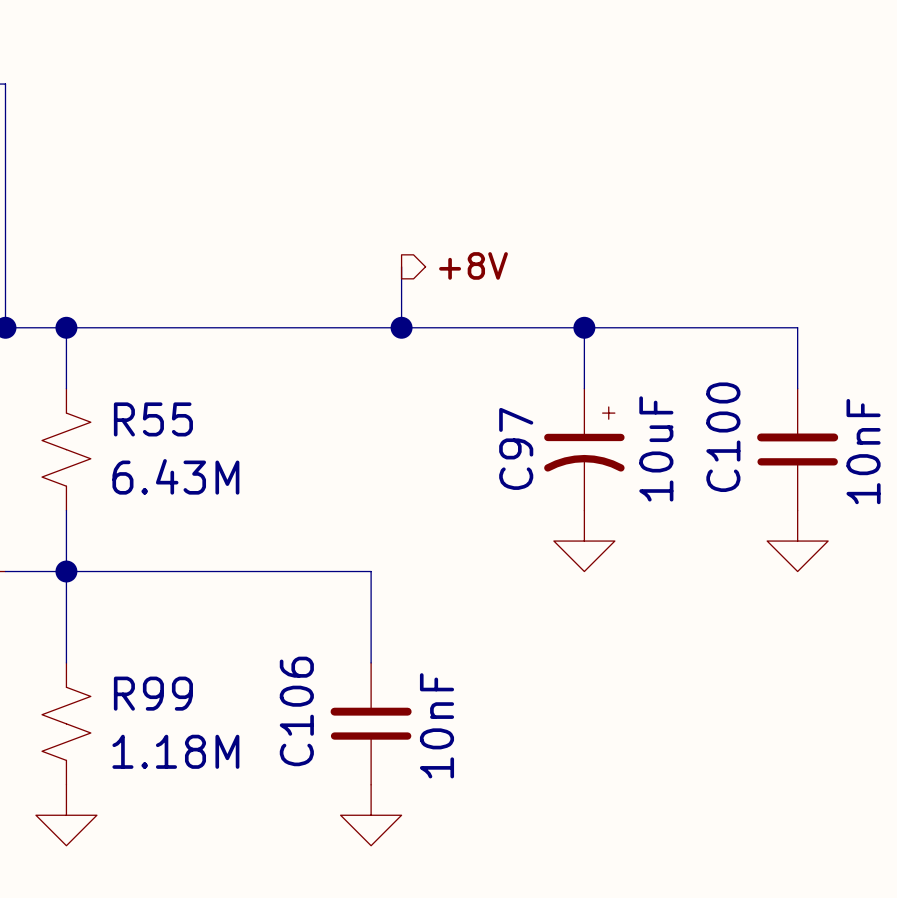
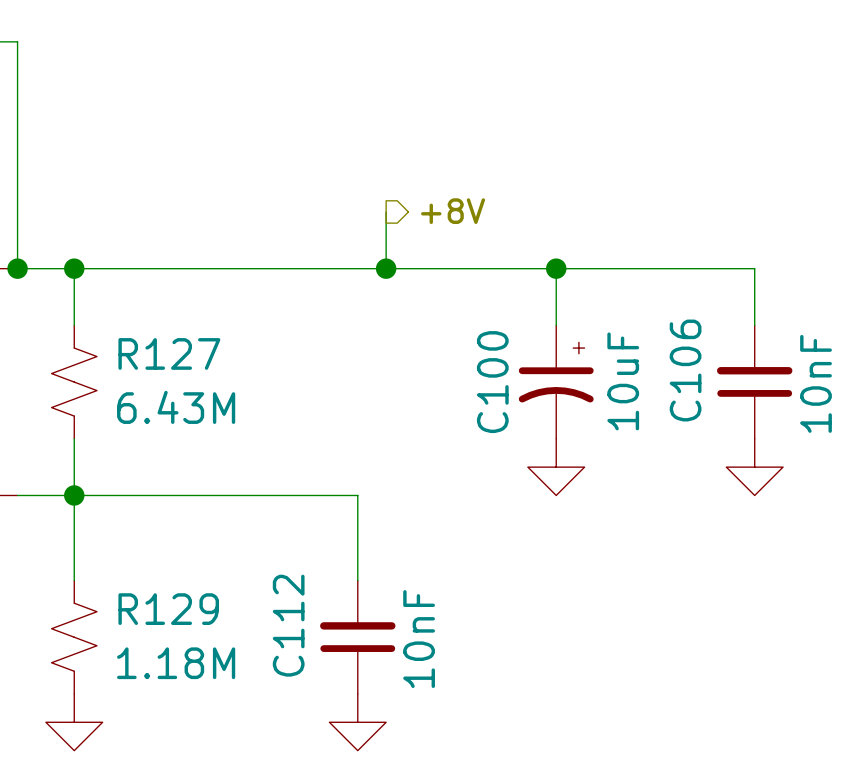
R55 name: R55 (153, 419) -> R127 (169, 353)
C100 name: C100 (723, 437) -> C106 (685, 370)
C97 name: C97 (516, 448) -> C100 (492, 382)
R99 name: R99 (153, 693) -> R129 (168, 609)
C106 name: C106 (296, 711) -> C112 (288, 625)

